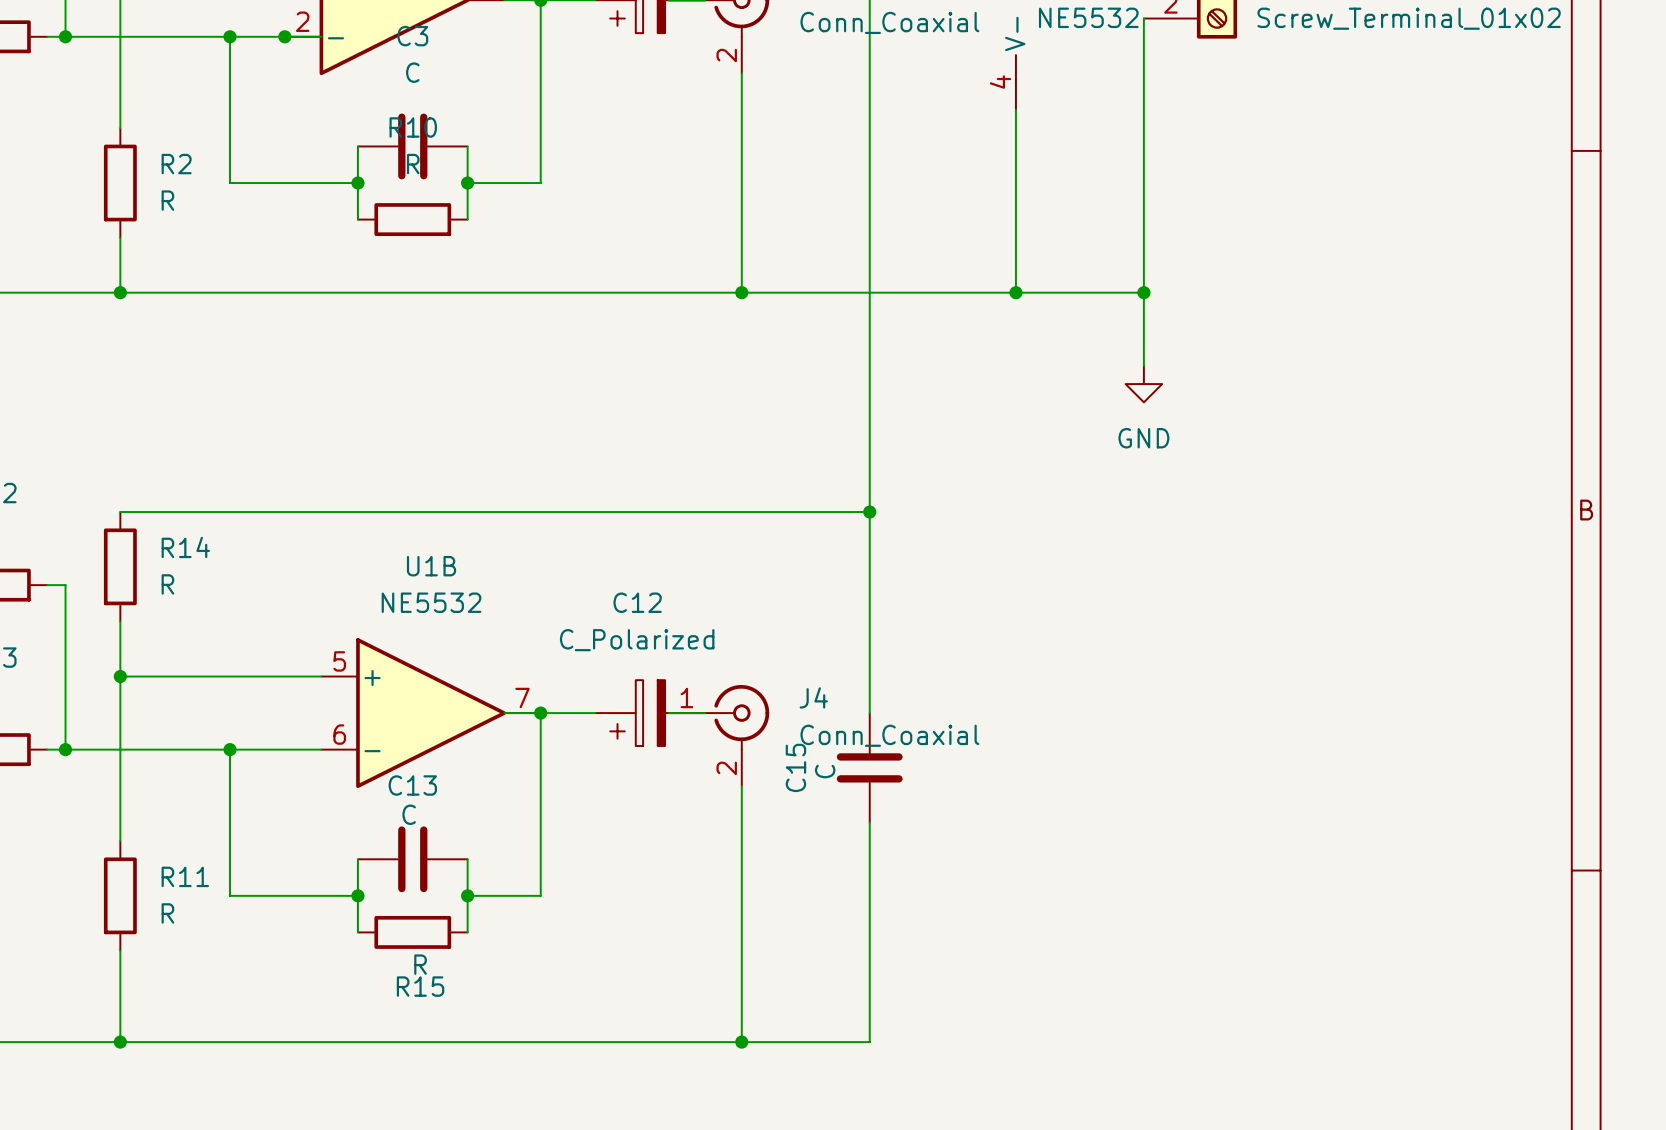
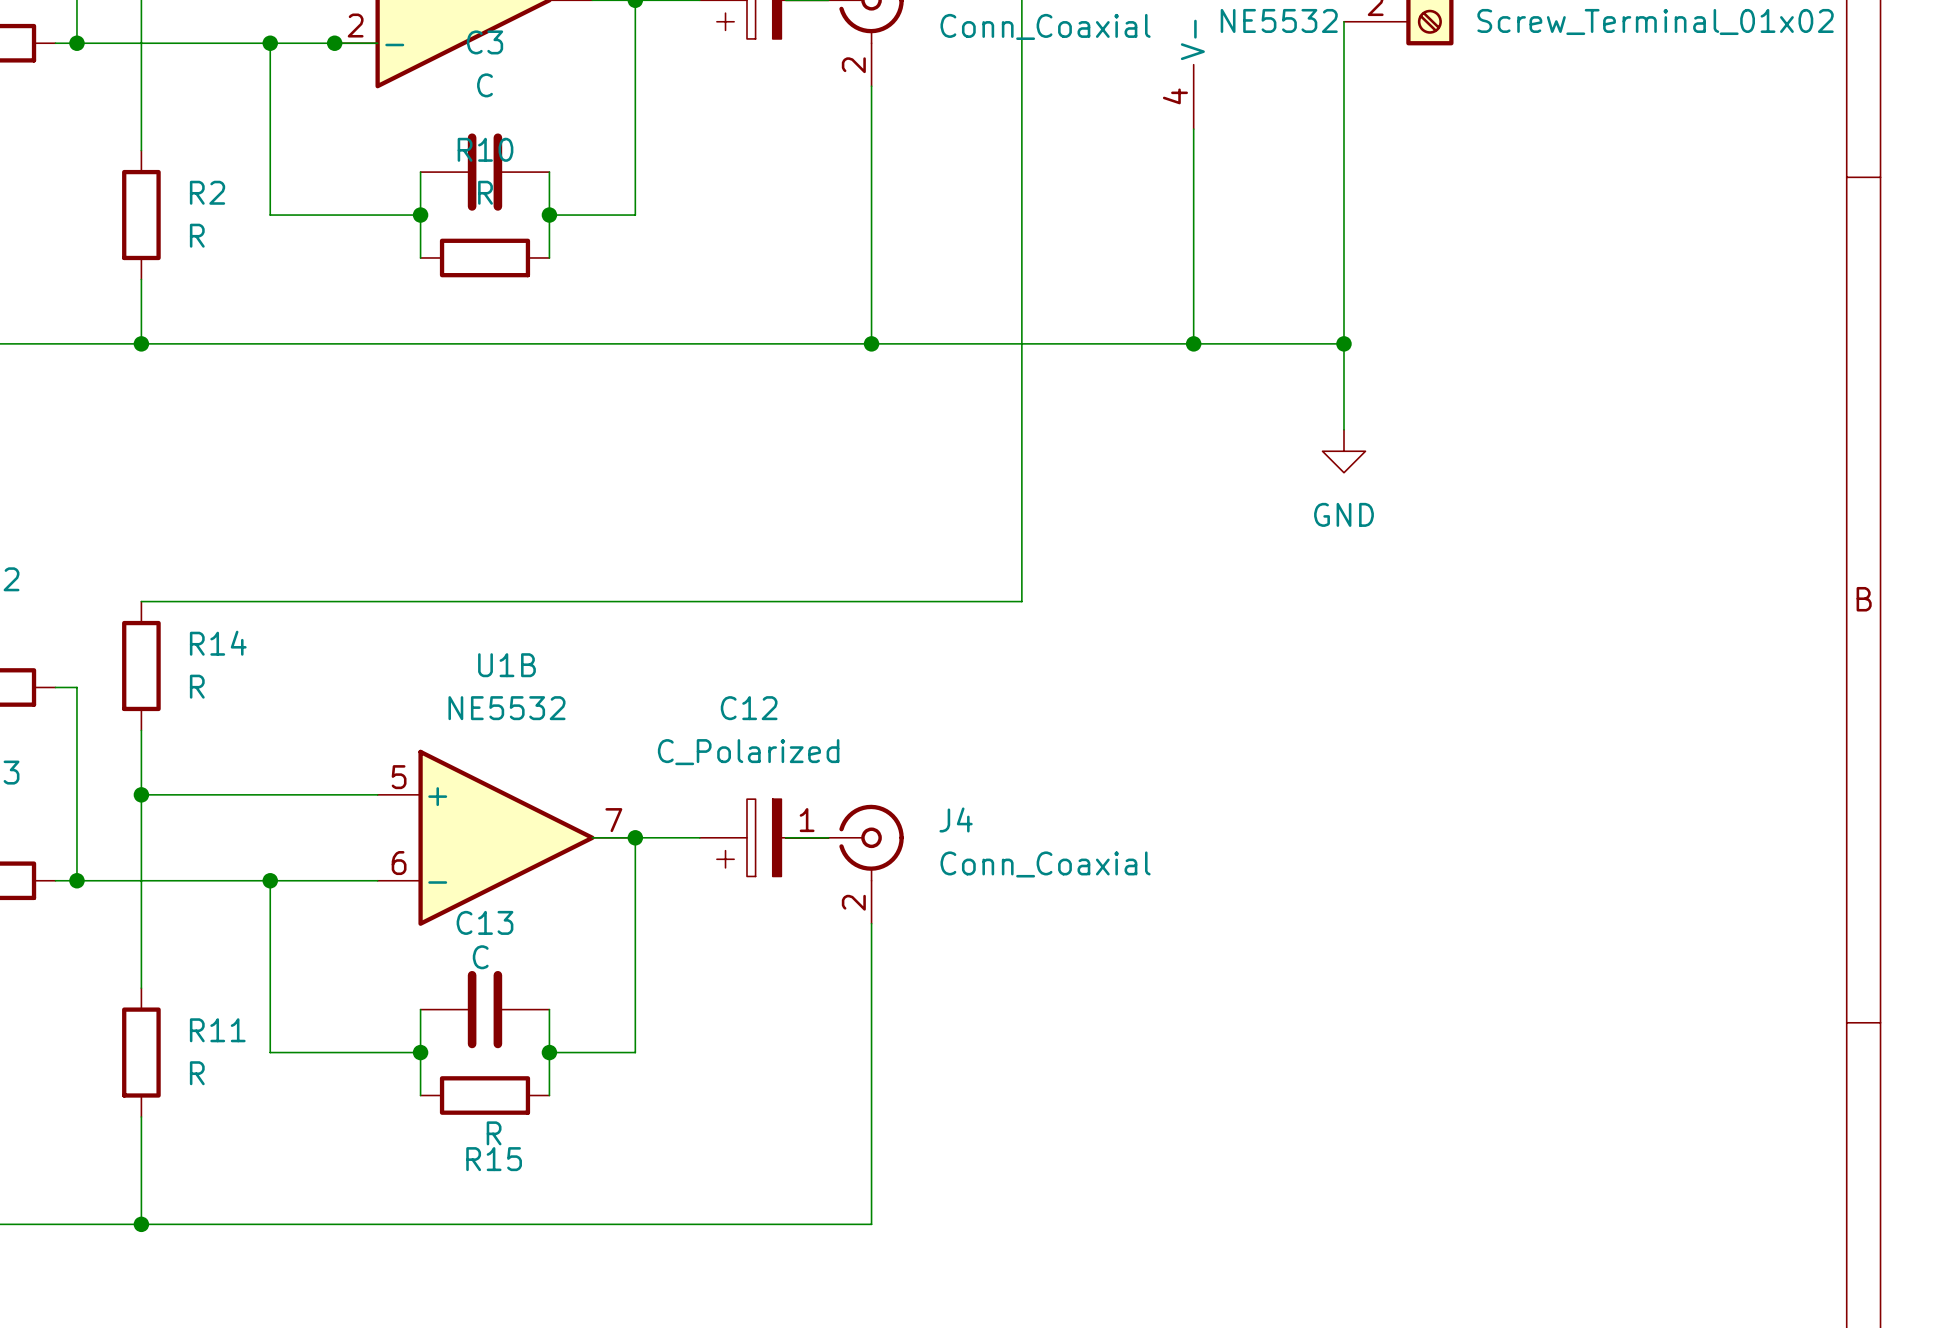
wire: (869, 512) (869, 713) -> none
junction: (869, 512) -> none
C15: C (869, 767) -> none
wire: (869, 822) (869, 1042) (741, 1042) -> none
junction: (741, 1042) -> none

